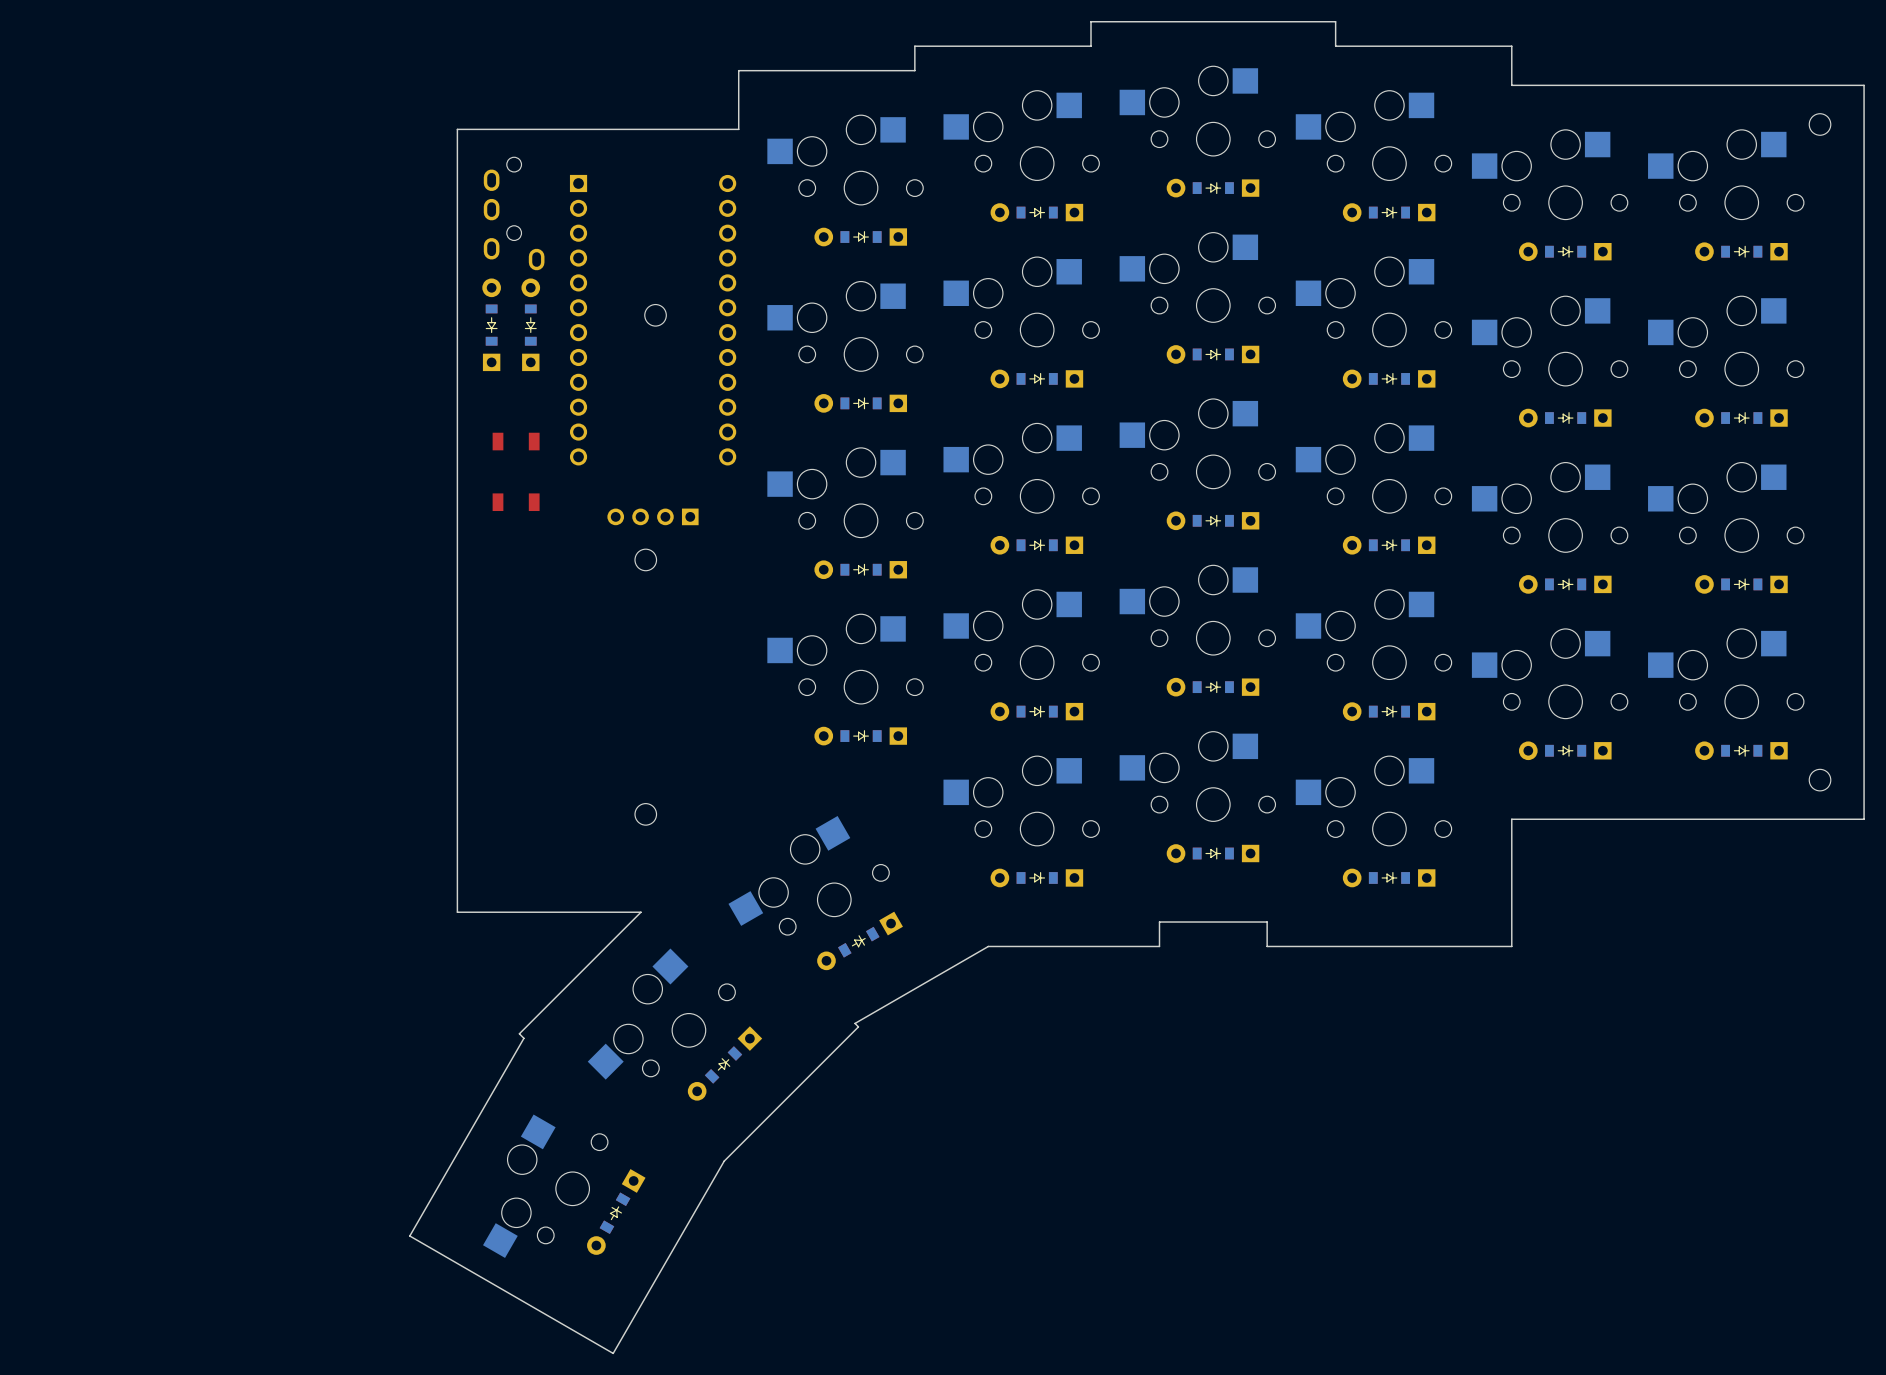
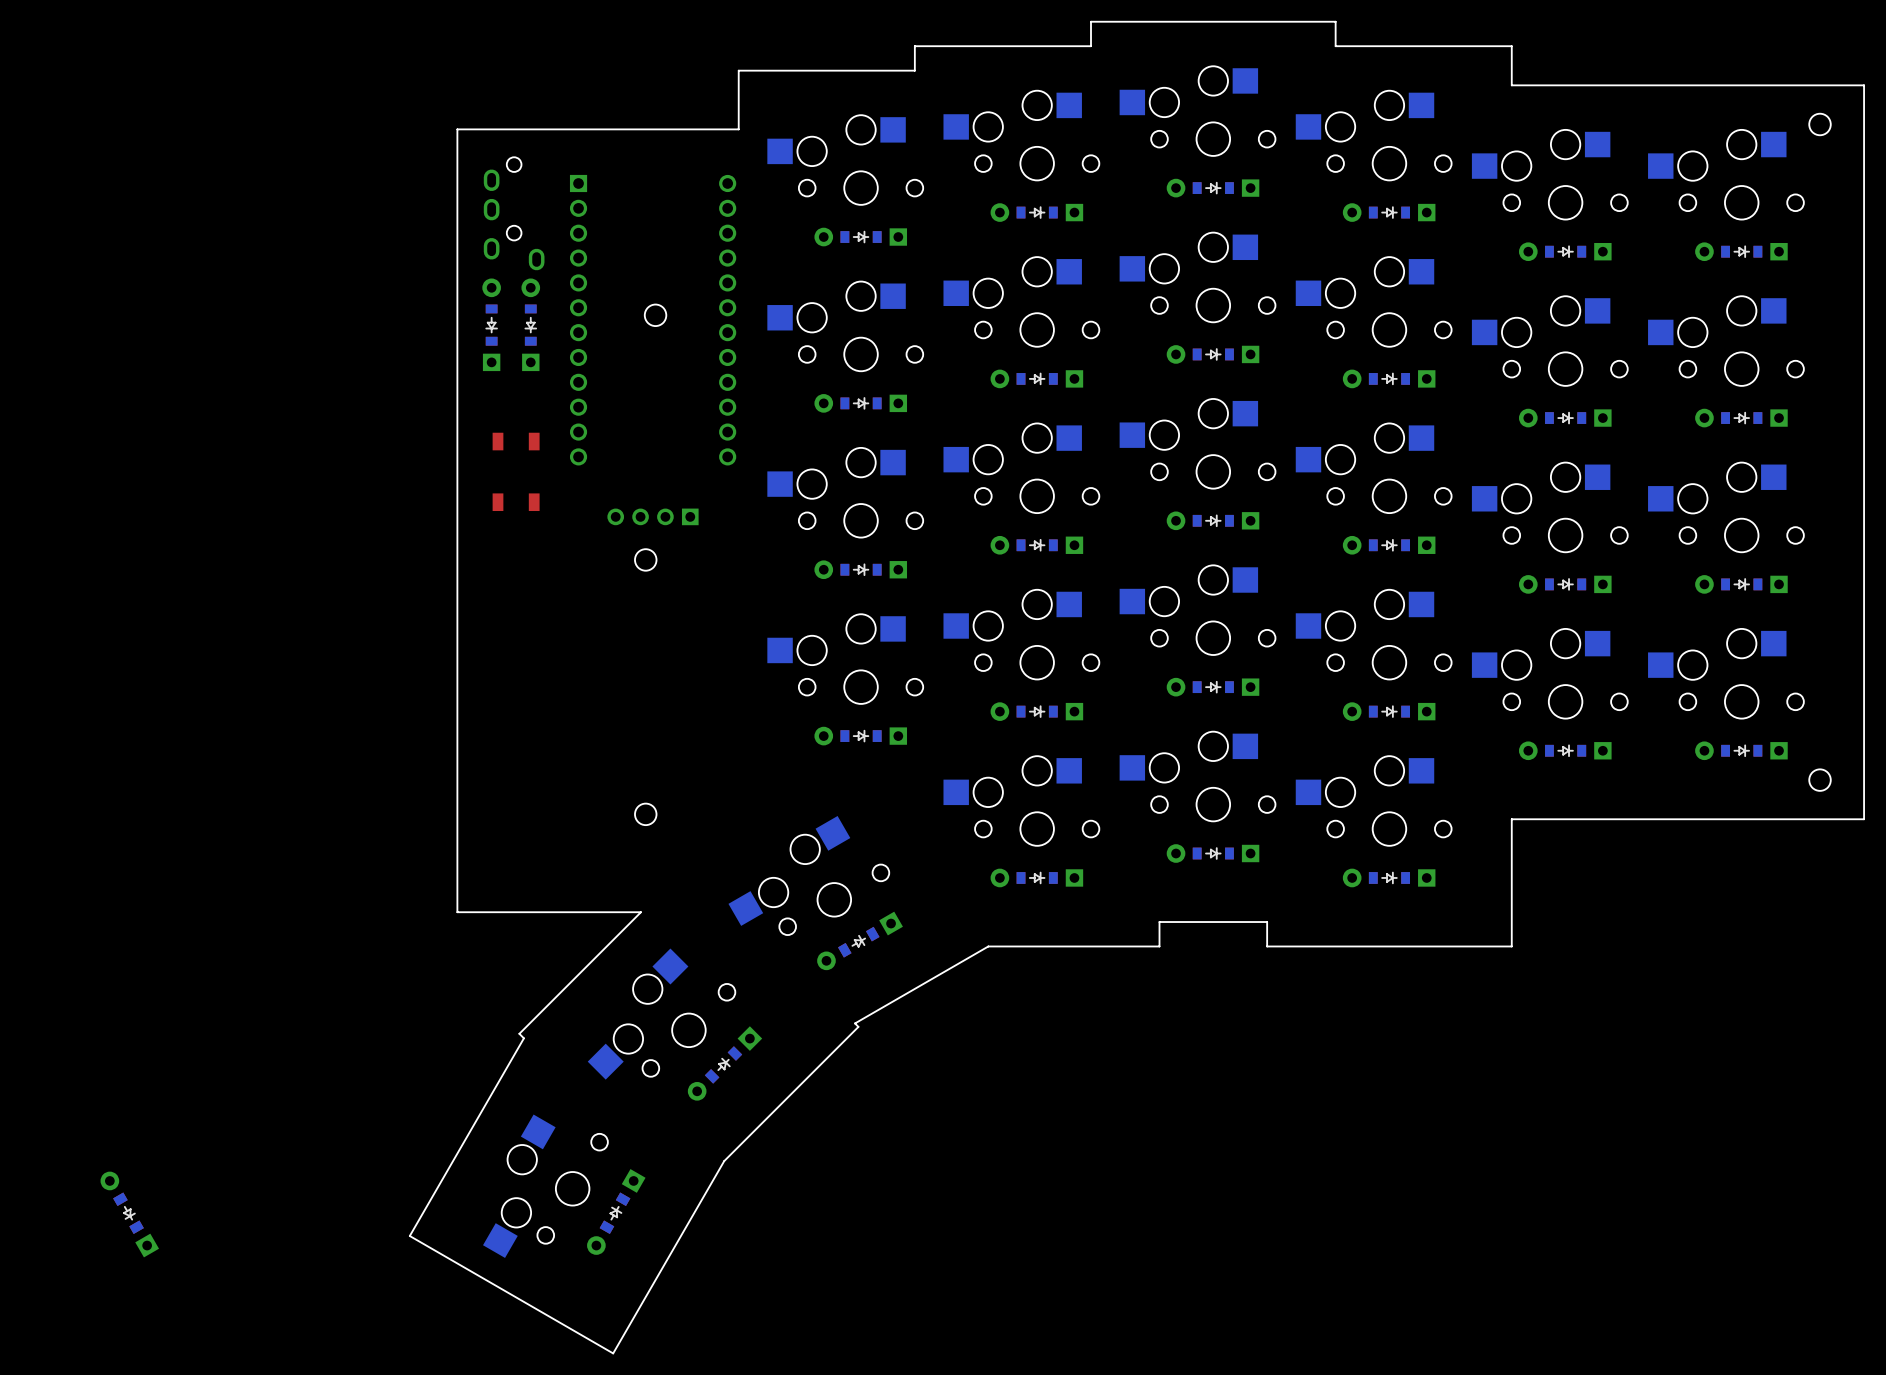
part: none -> (129, 1214)

